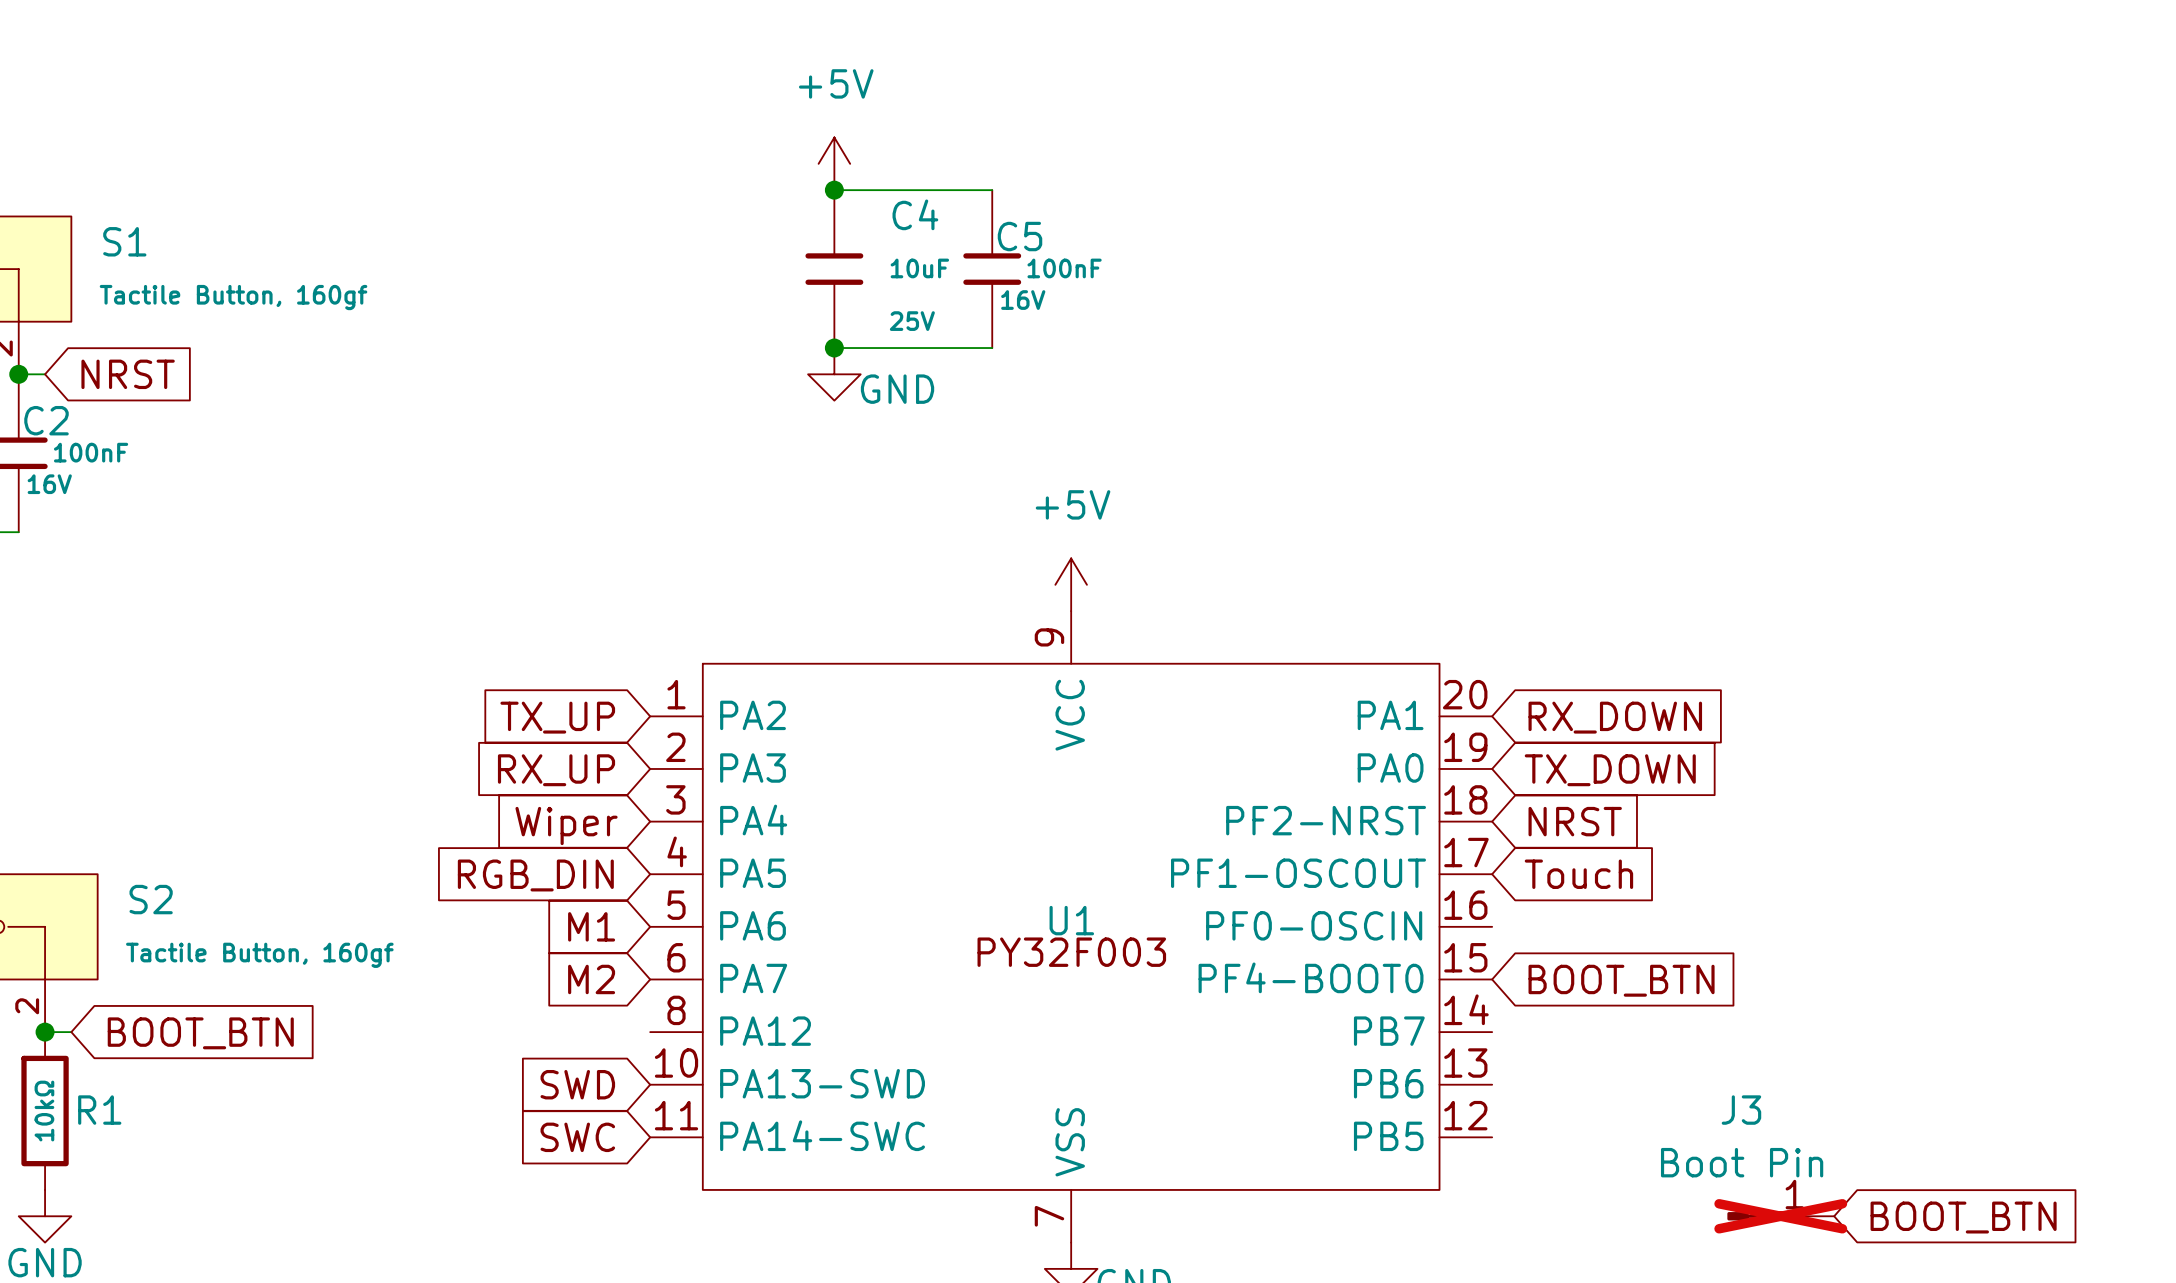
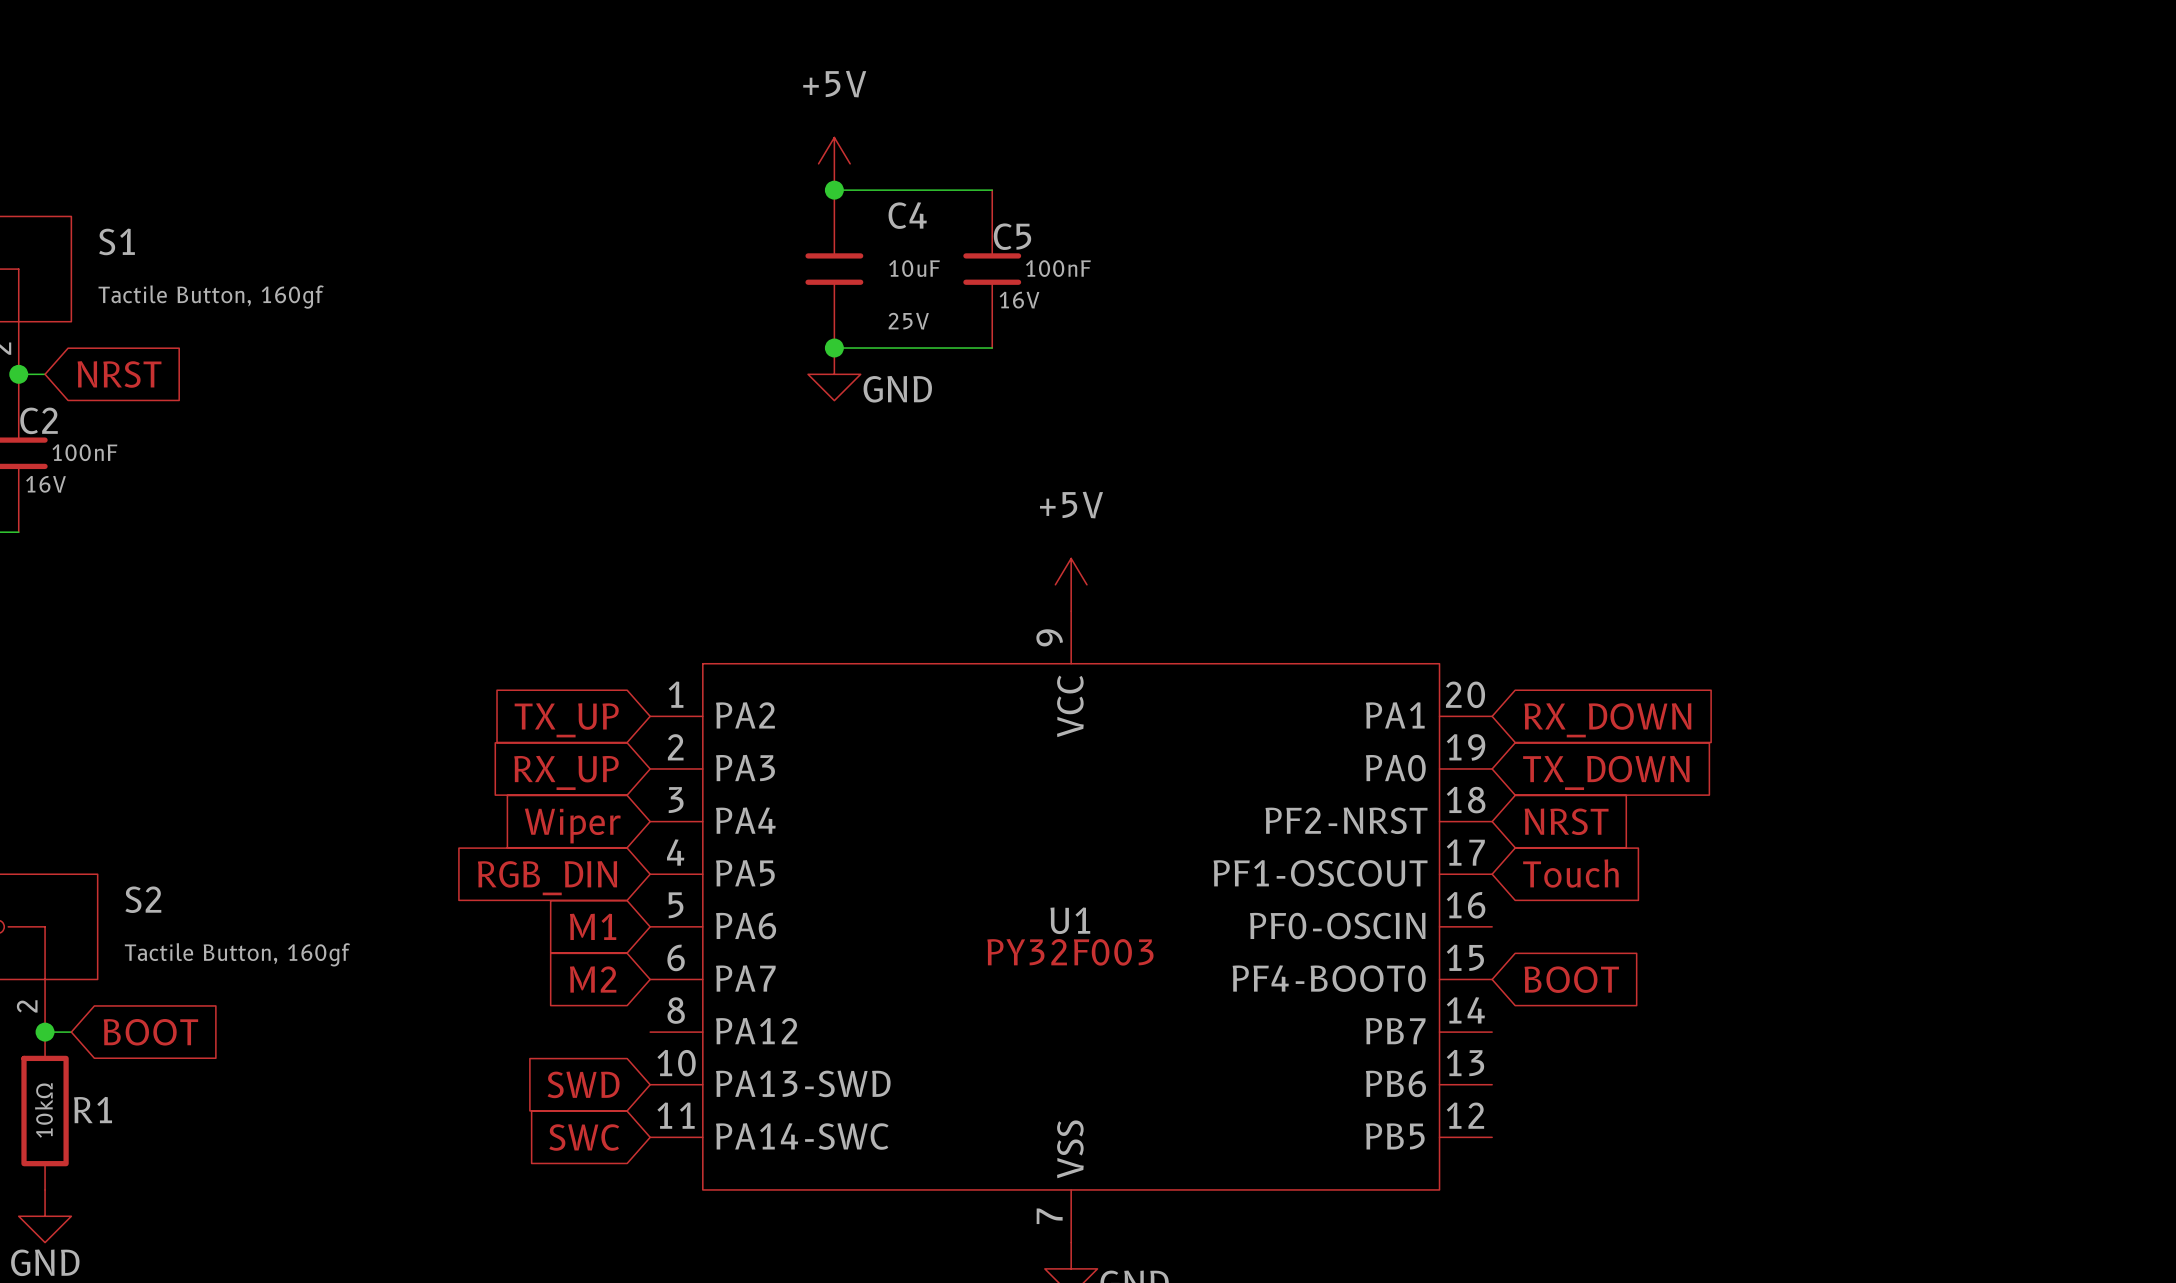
global label: BOOT_BTN (1621, 980) -> BOOT (1571, 979)
global label: BOOT_BTN (200, 1033) -> BOOT (150, 1032)
J3: Boot Pin (1780, 1216) -> none
global label: BOOT_BTN (1963, 1217) -> none

